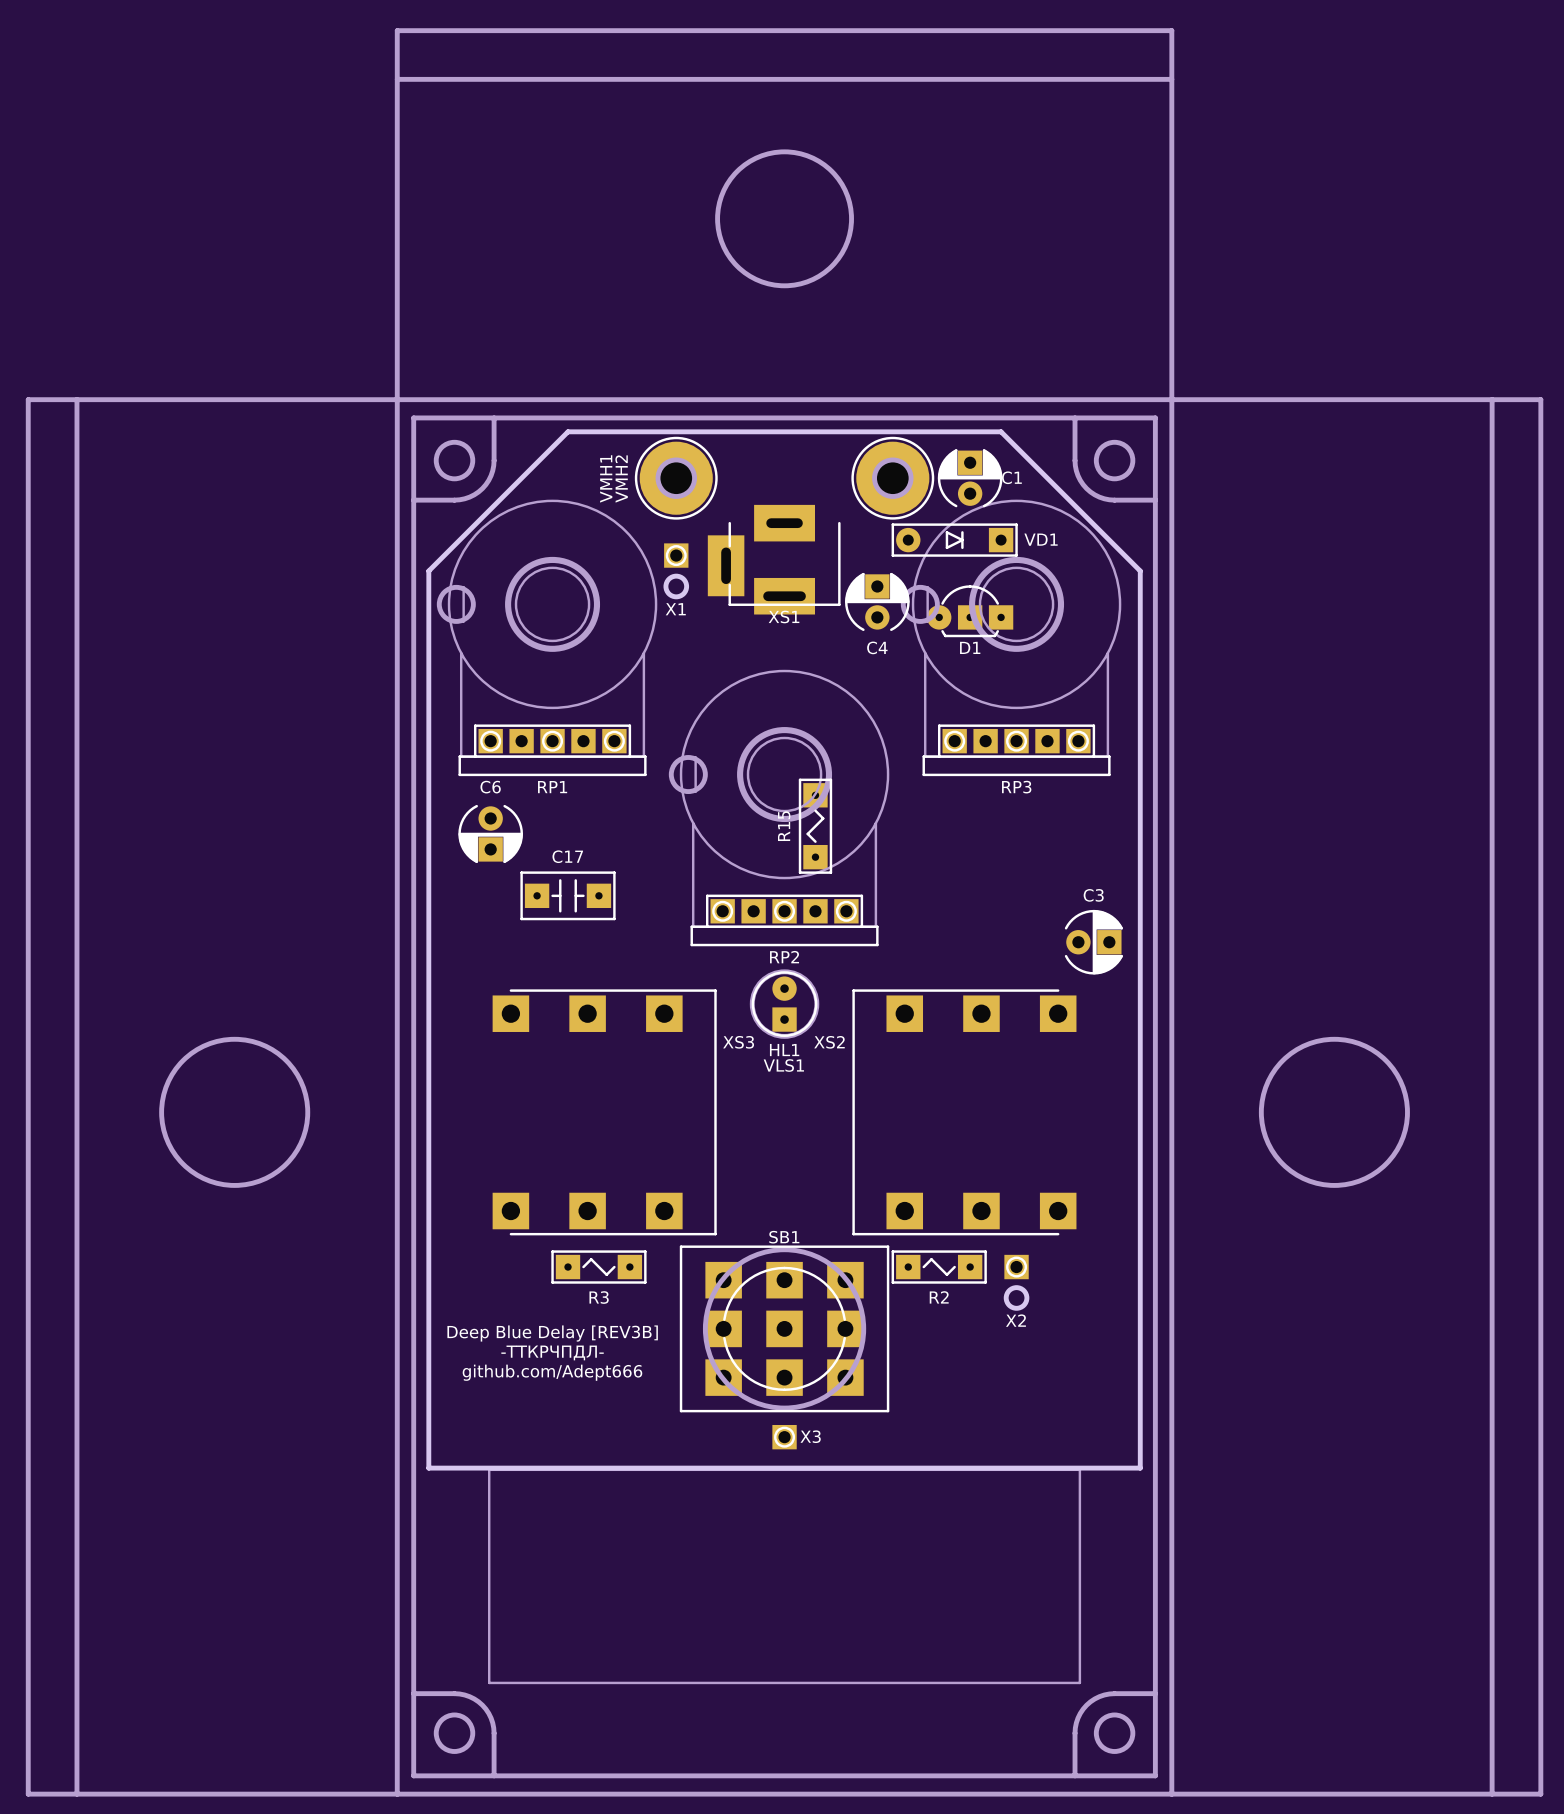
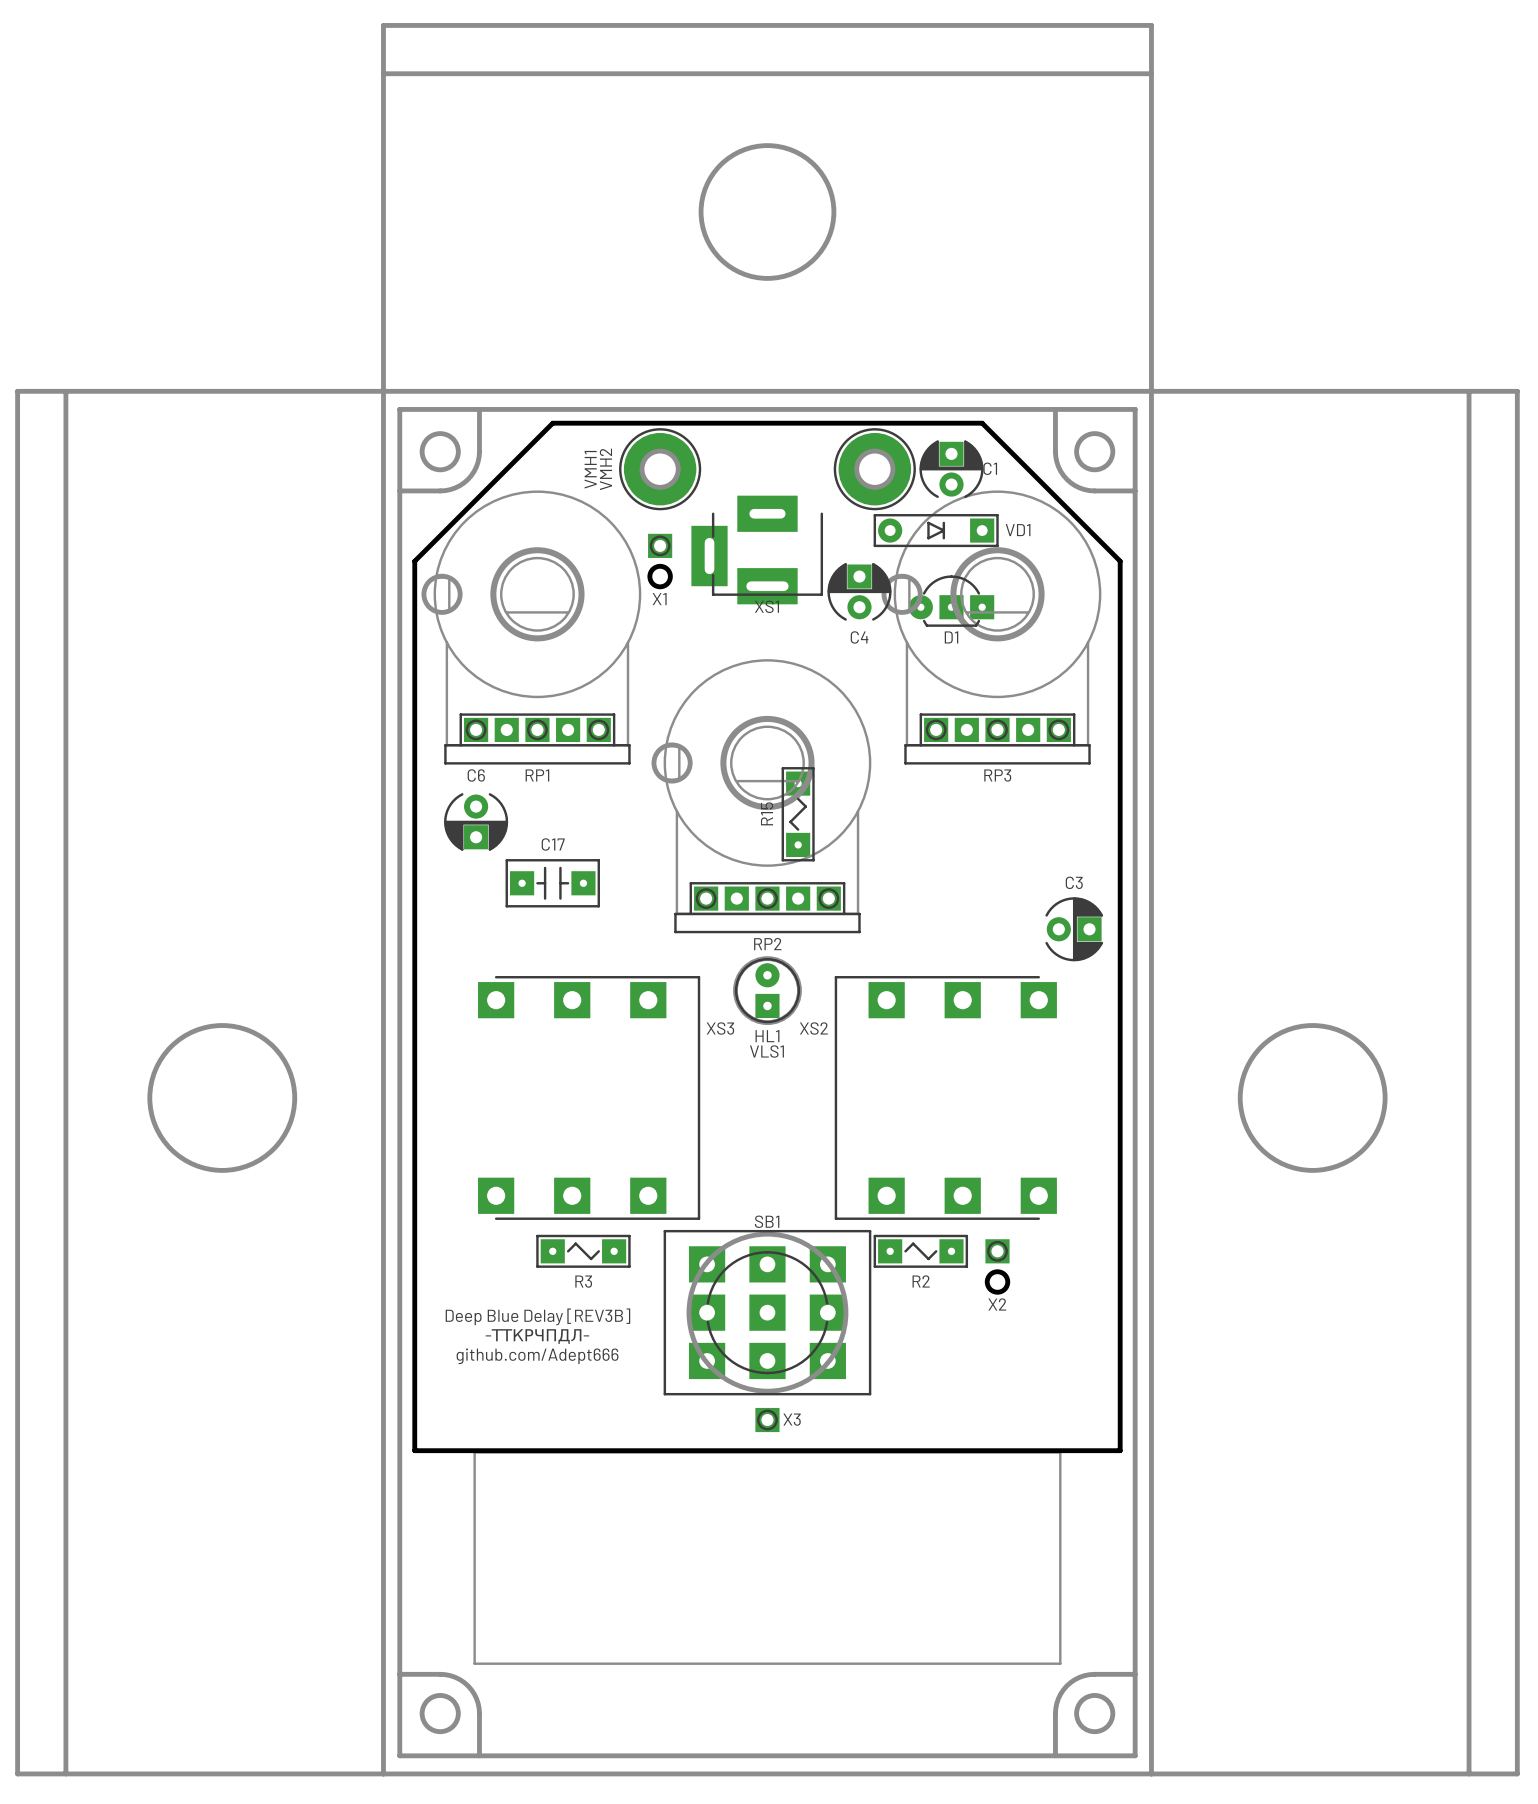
RP1 footprint: [436, 499, 658, 777] -> [421, 490, 642, 765]
RP3 footprint: [900, 499, 1122, 777] -> [881, 490, 1102, 765]
RP2 footprint: [668, 669, 890, 947] -> [651, 659, 872, 934]

